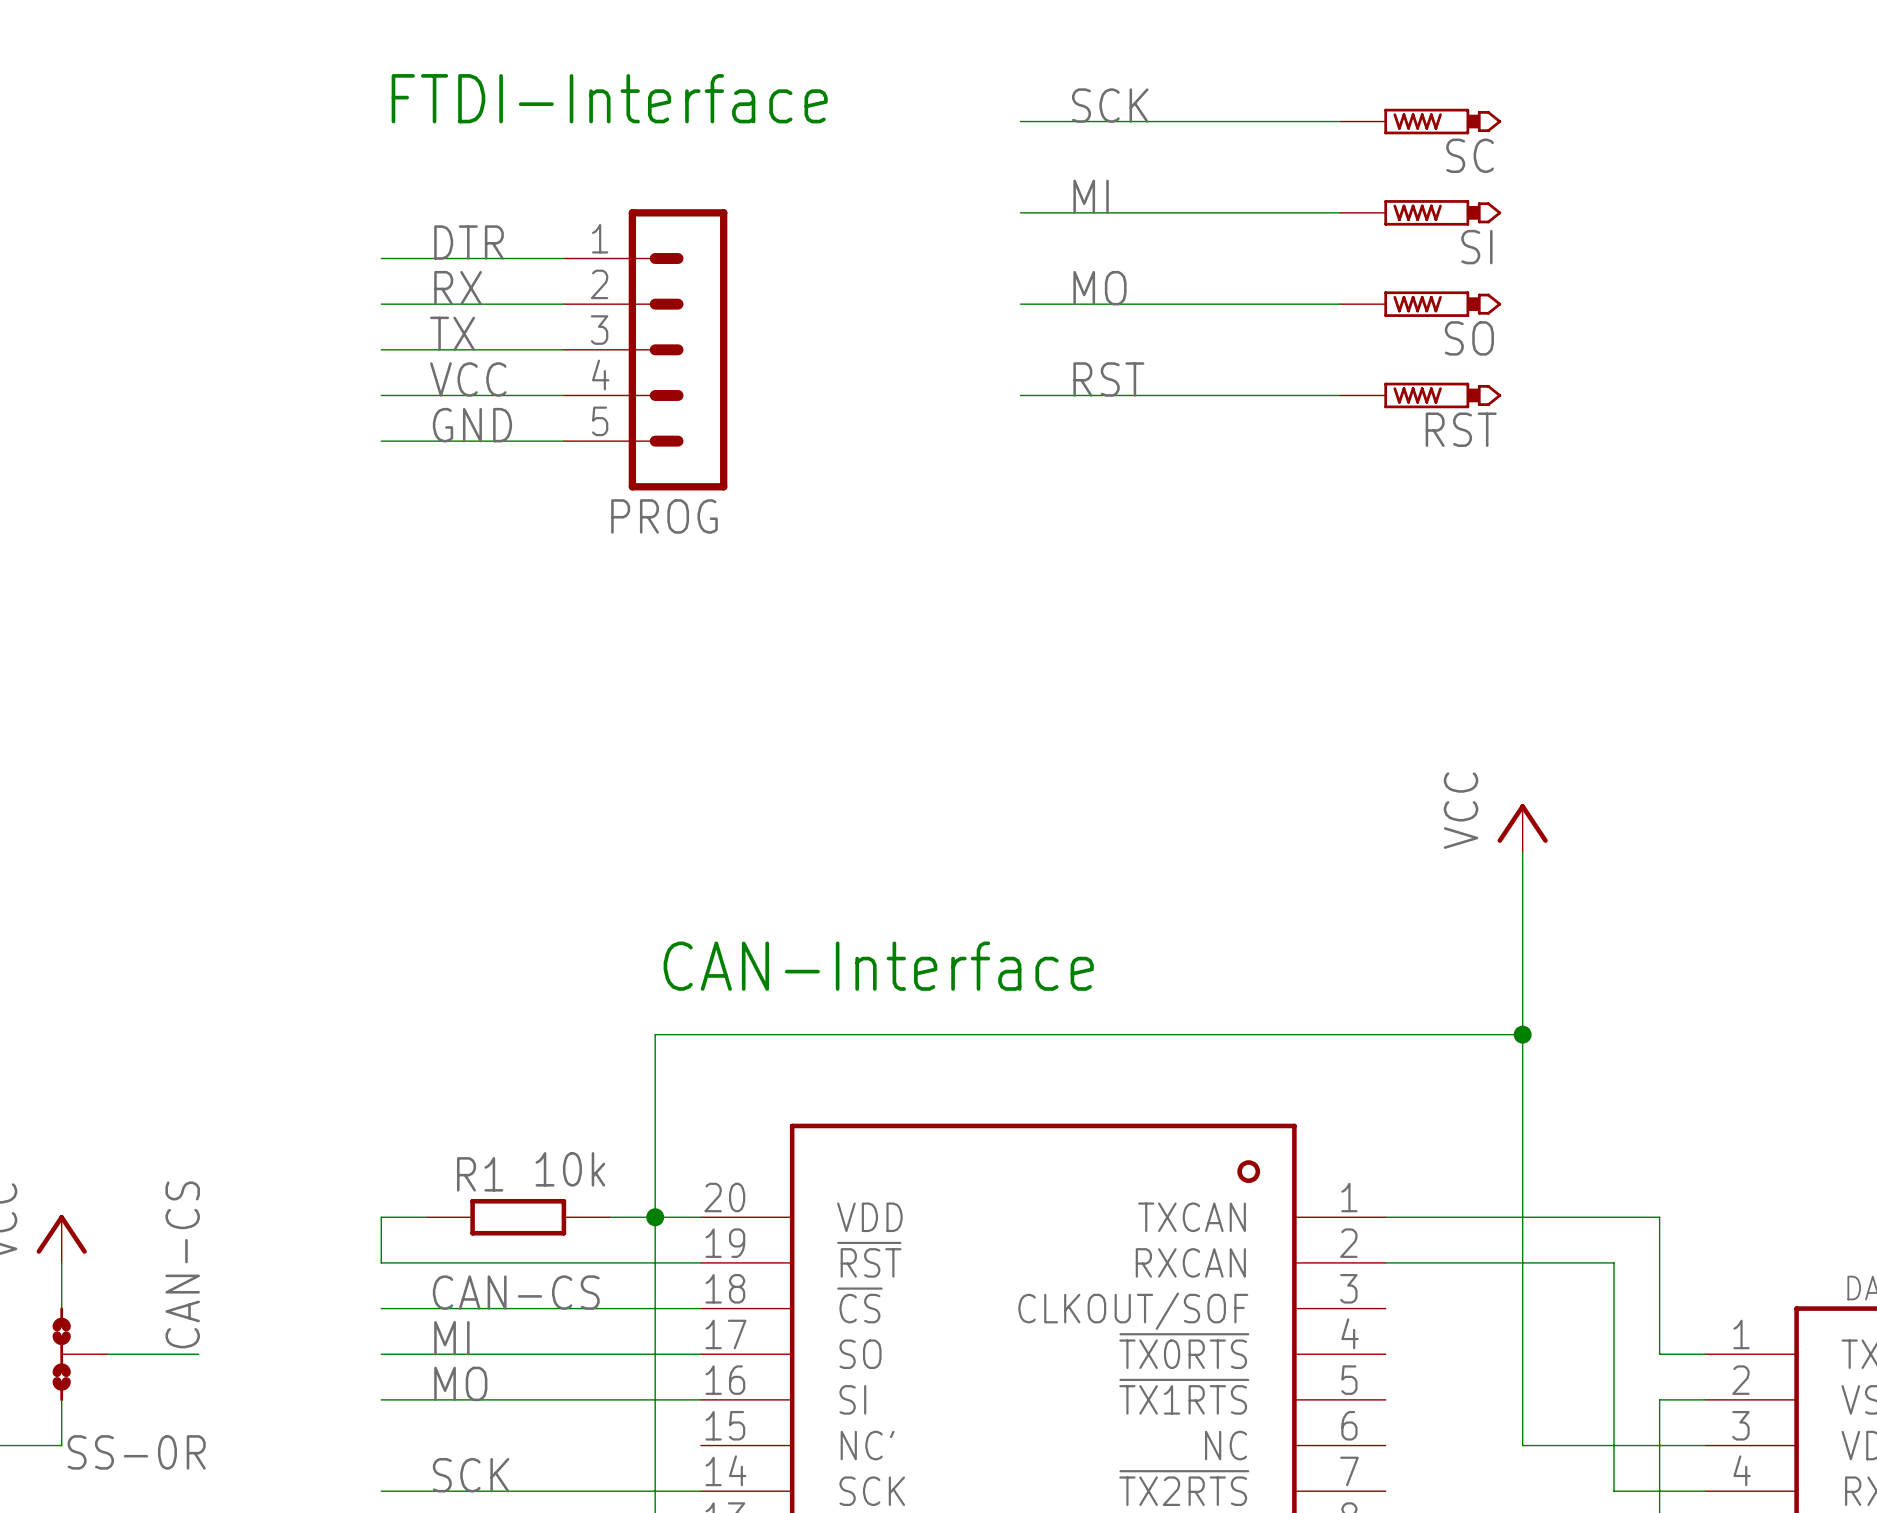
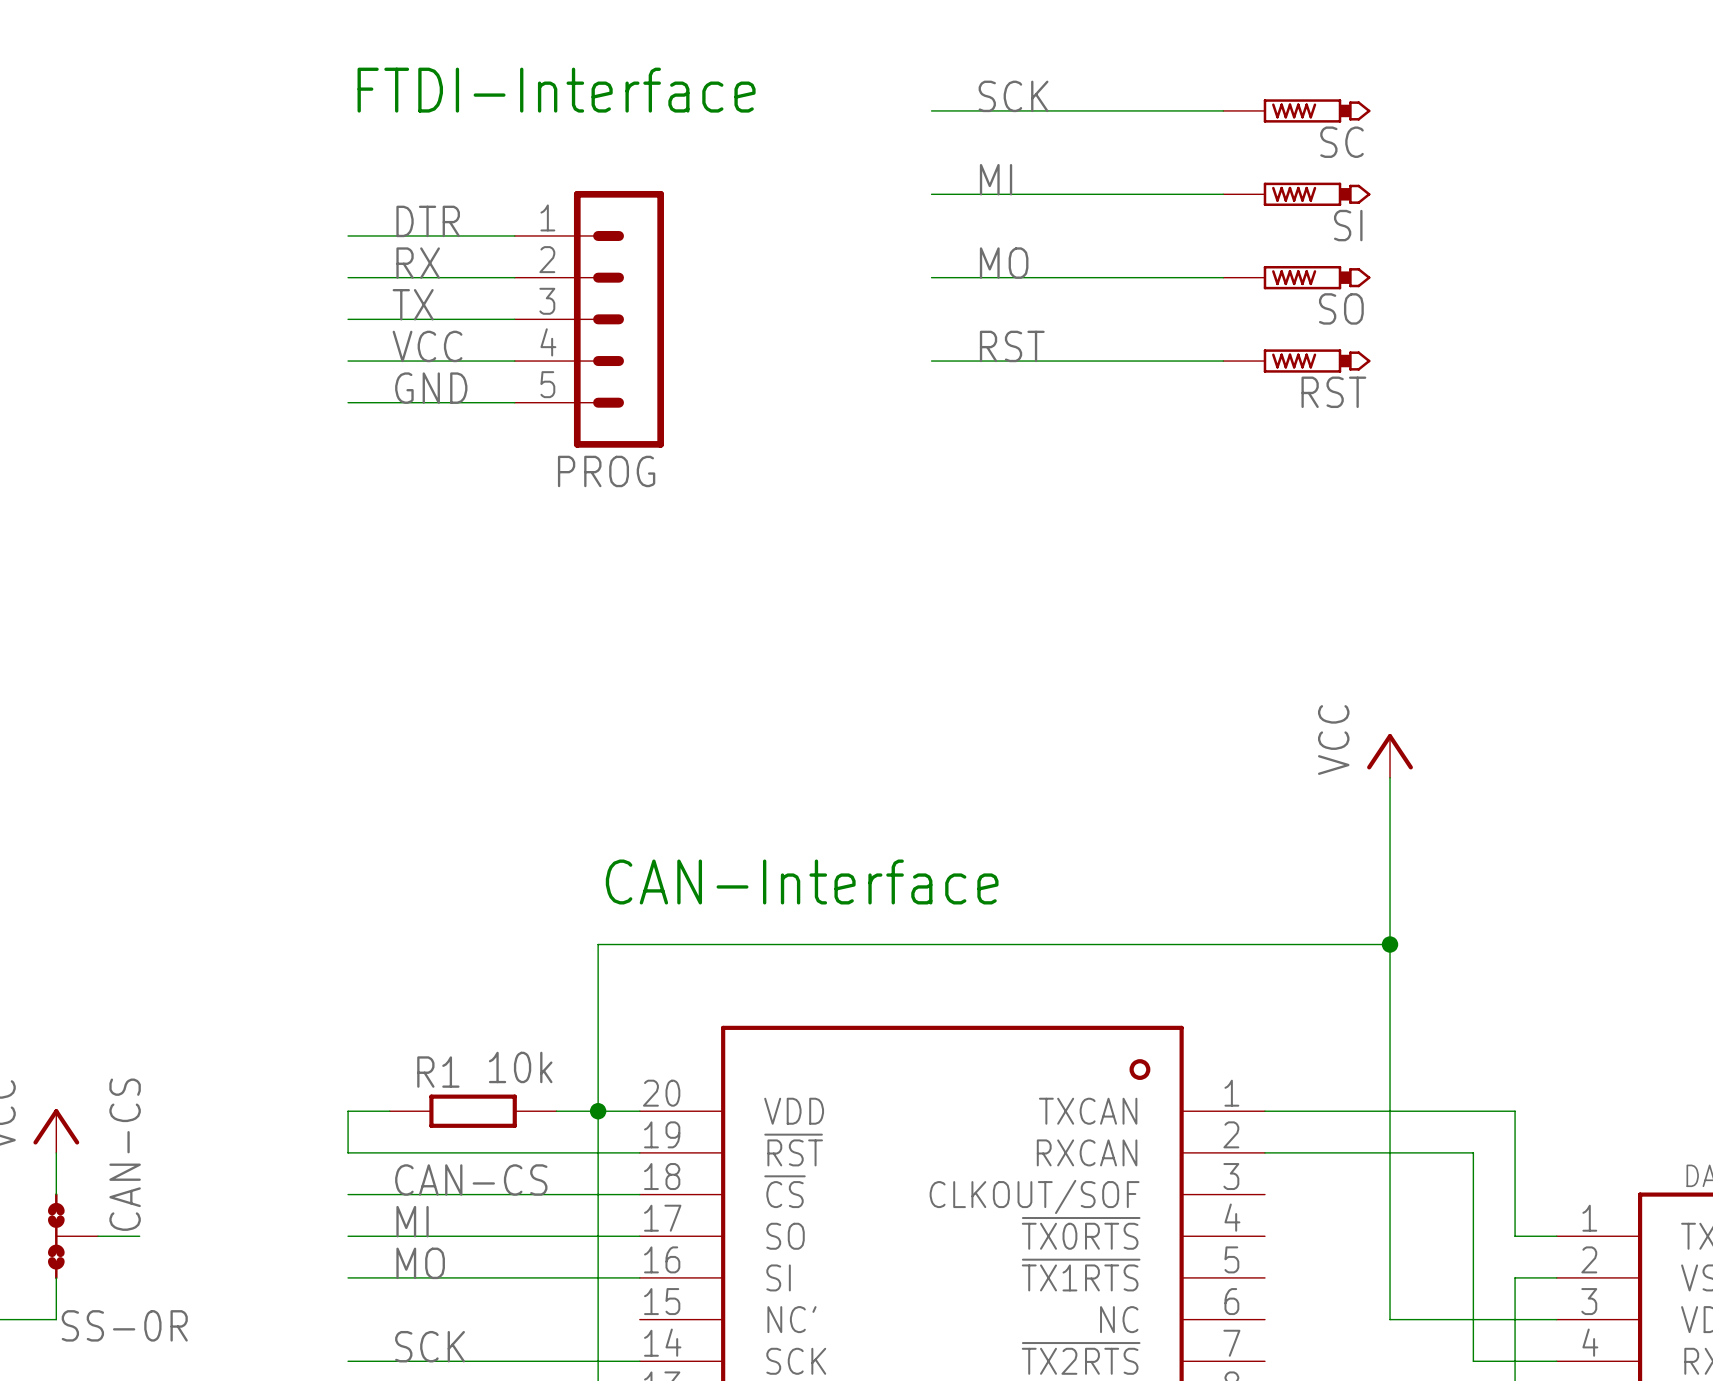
label position: CAN-CS (182, 1264) -> CAN-CS (125, 1154)
wire: (153, 1354) (198, 1354) -> none

